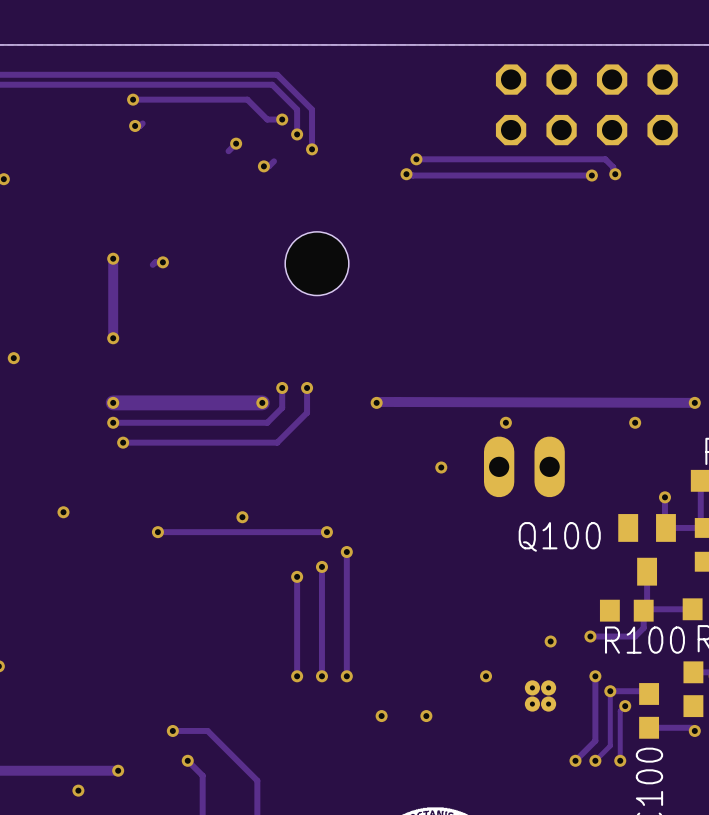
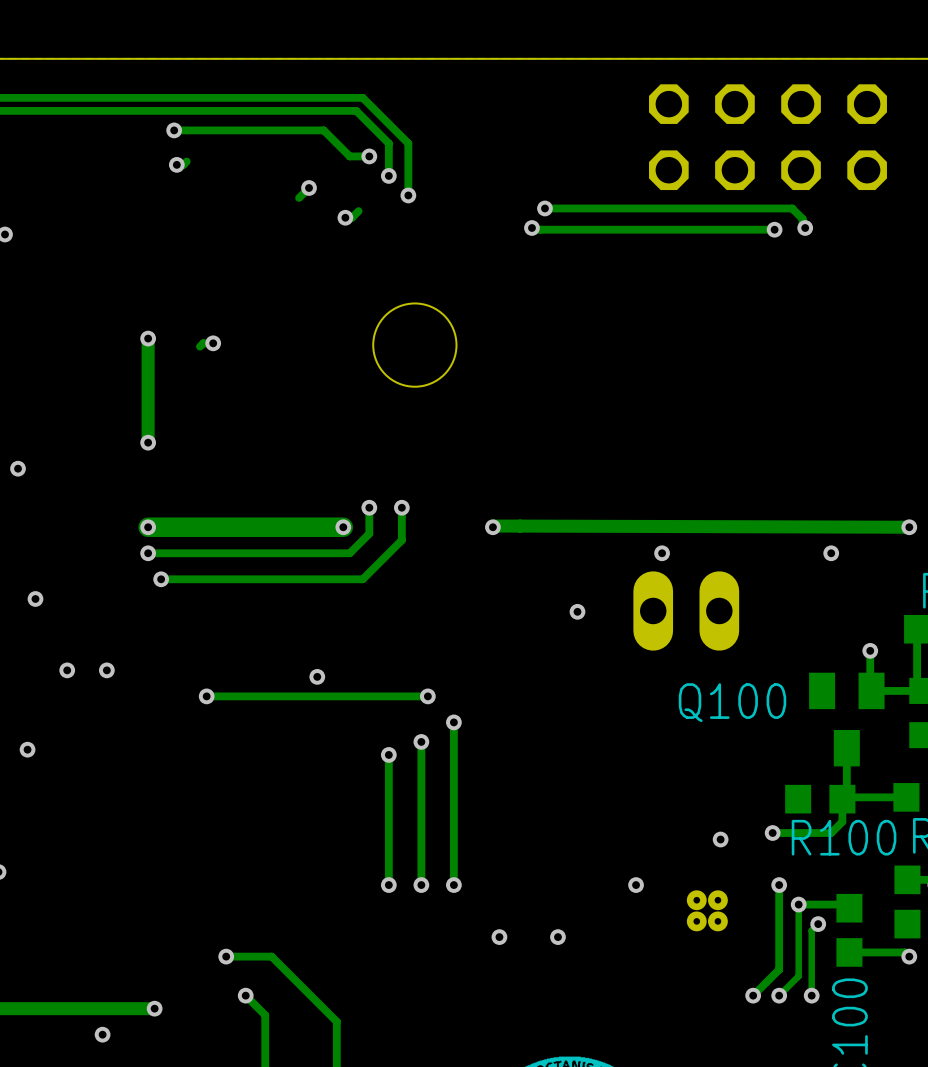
via: none -> (35, 598)
via: none -> (67, 670)
via: (63, 512) -> none
via: none -> (106, 670)
via: none -> (27, 749)

